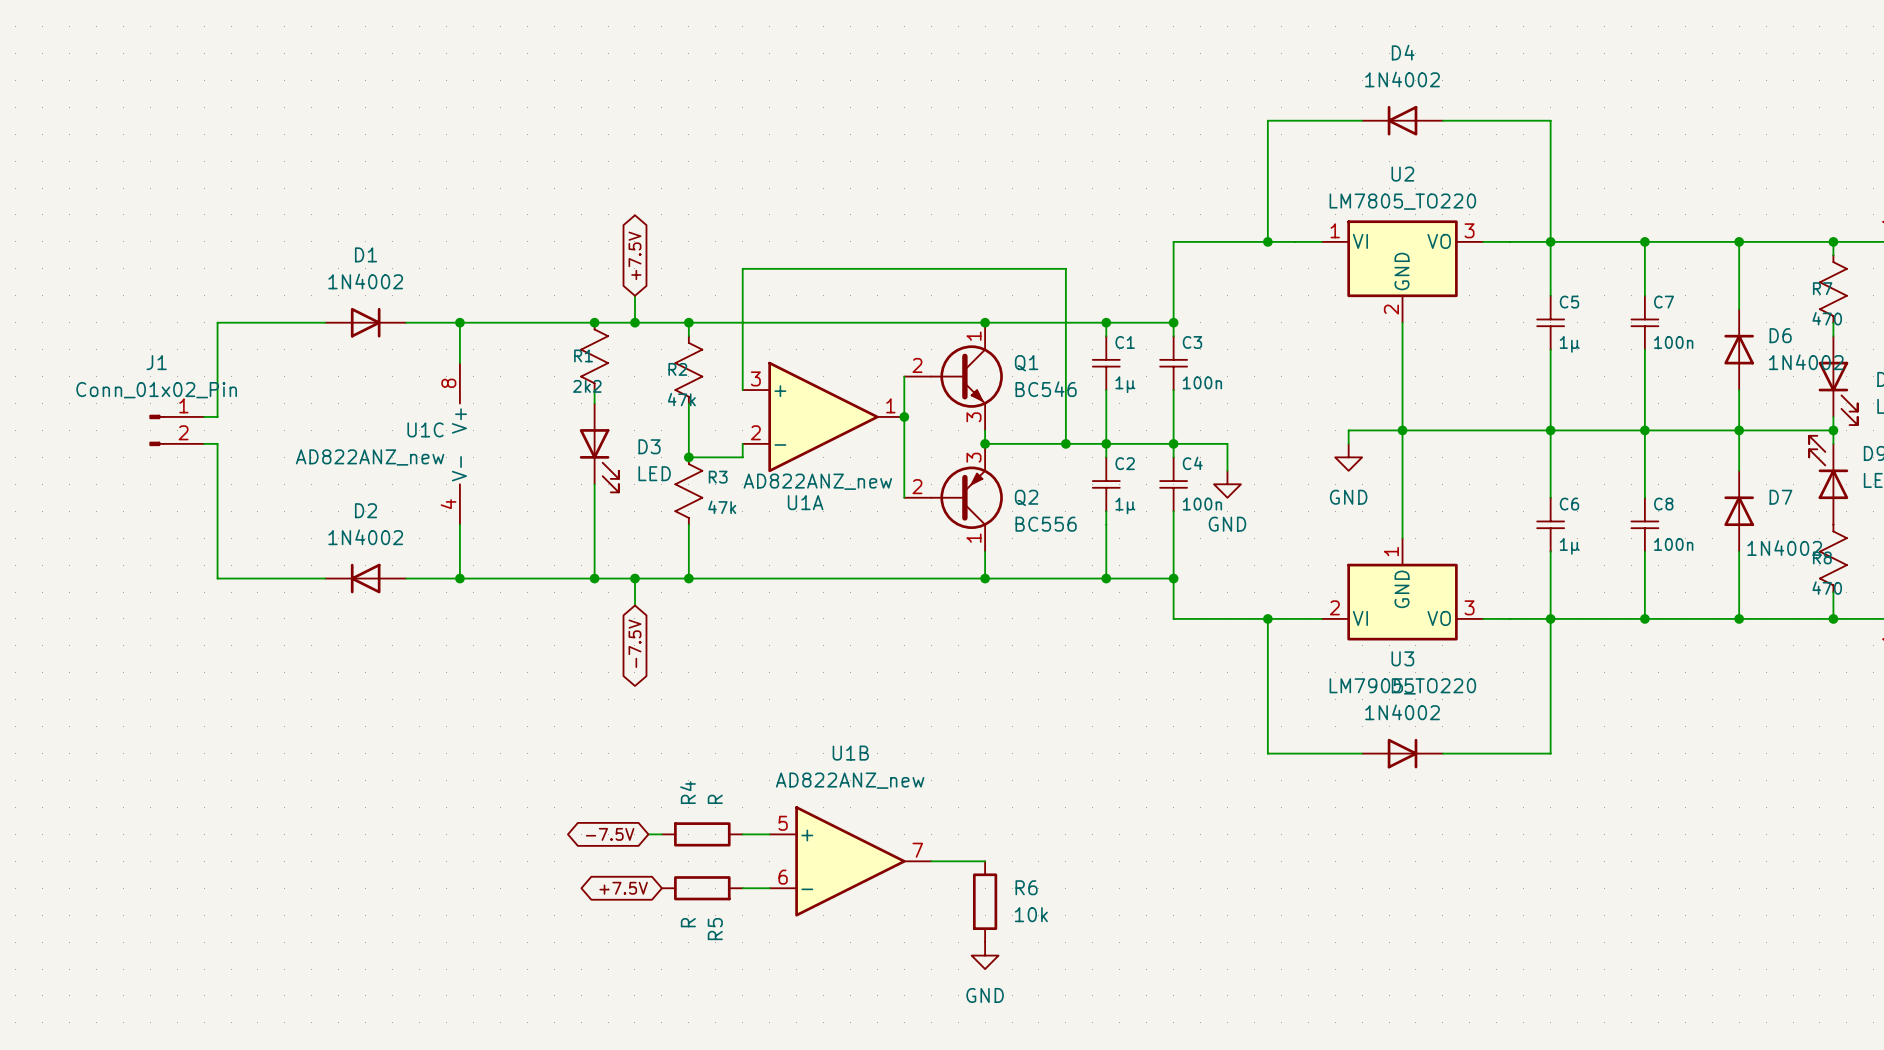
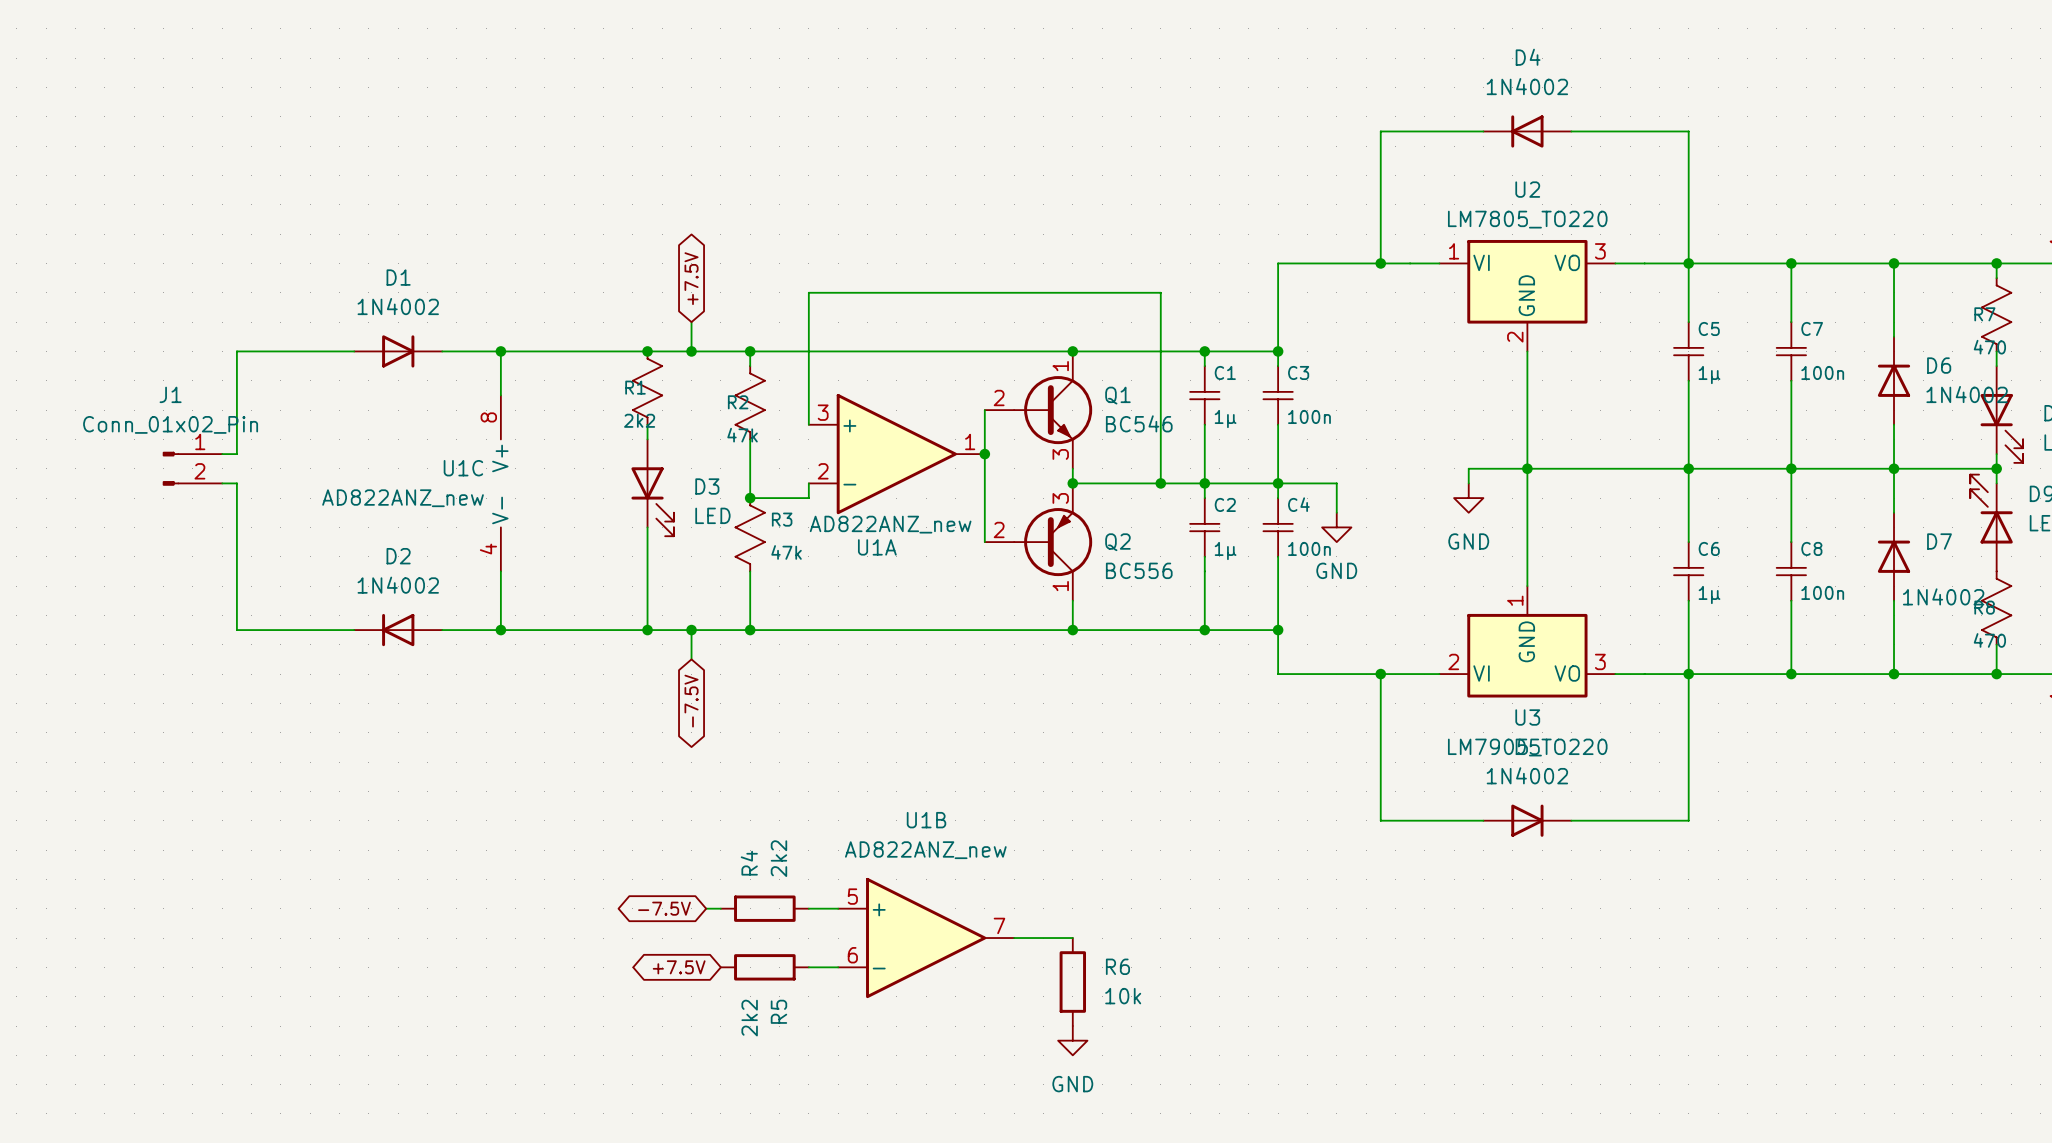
R4 value: R (715, 799) -> 2k2 (778, 858)
R5 value: R (688, 922) -> 2k2 (749, 1018)

